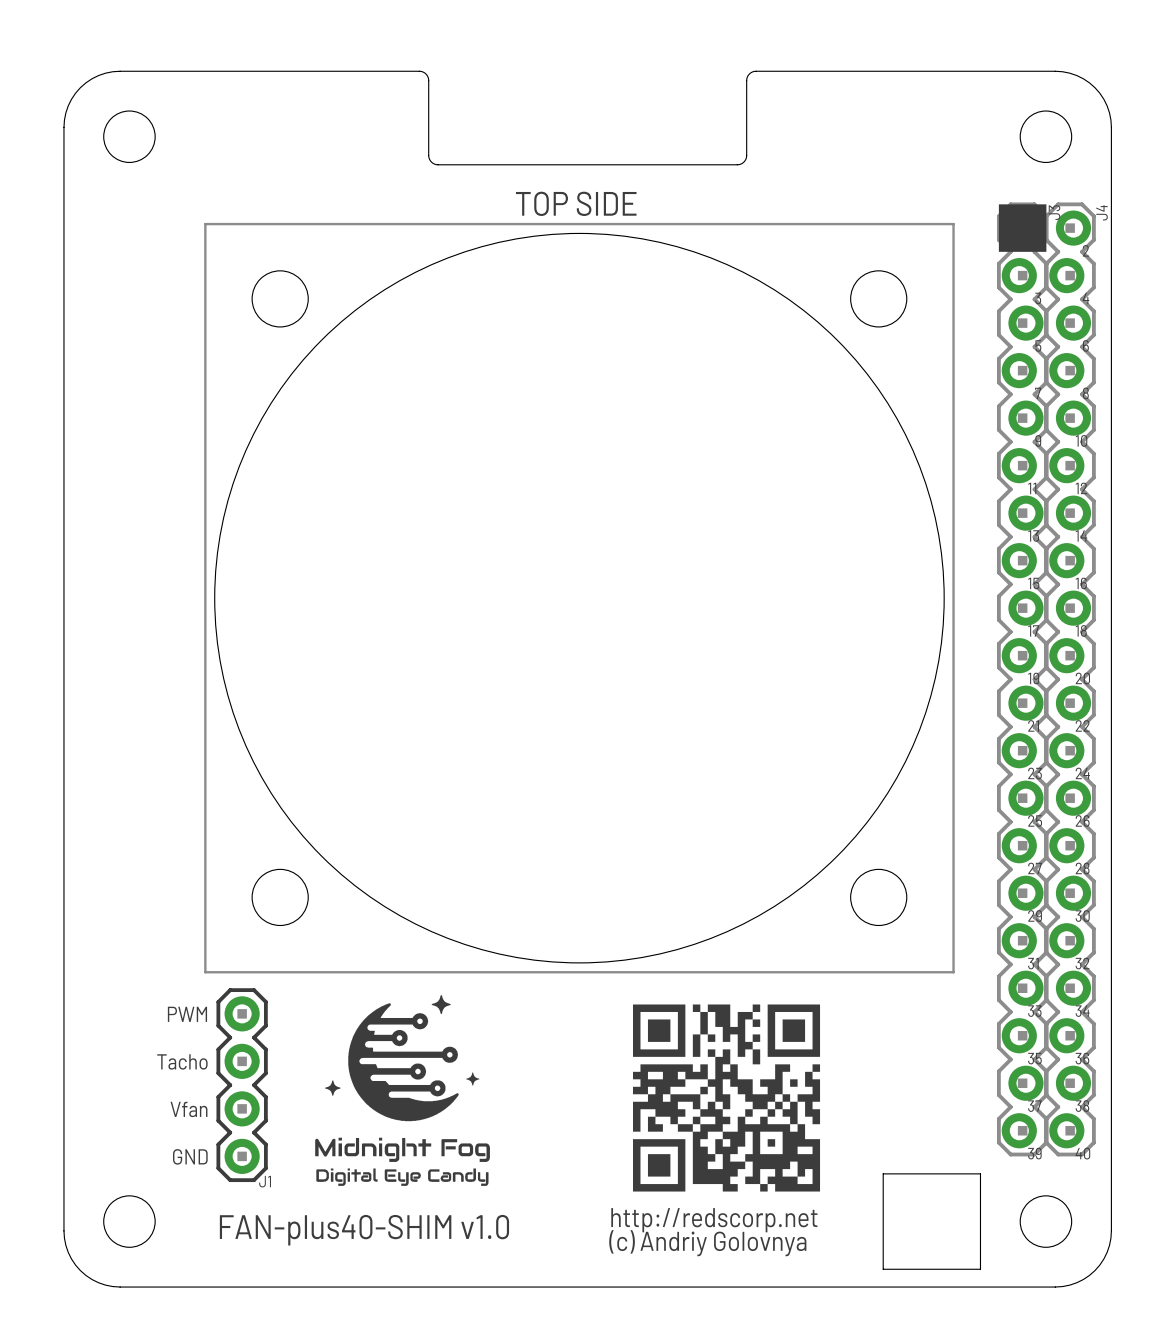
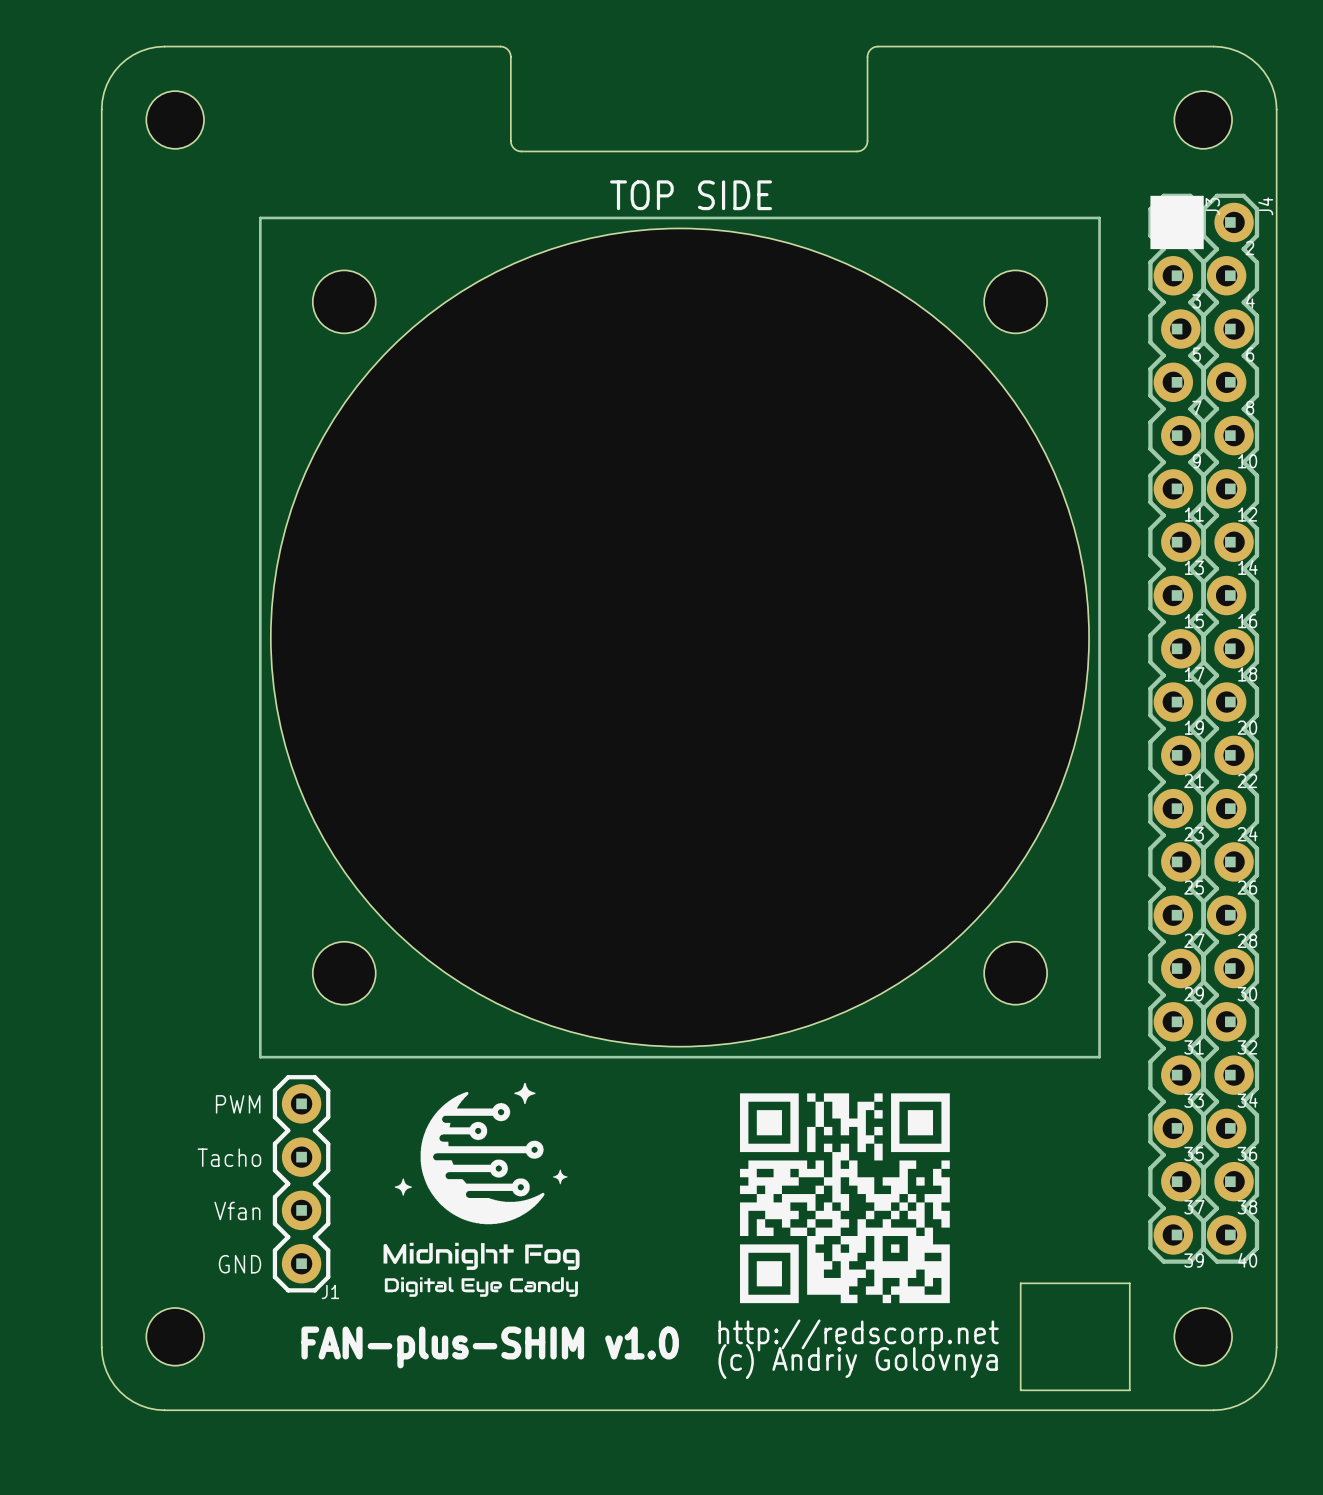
text: FAN-plus40-SHIM v1.0 (364, 1230) -> FAN-plus-SHIM v1.0 (490, 1347)

